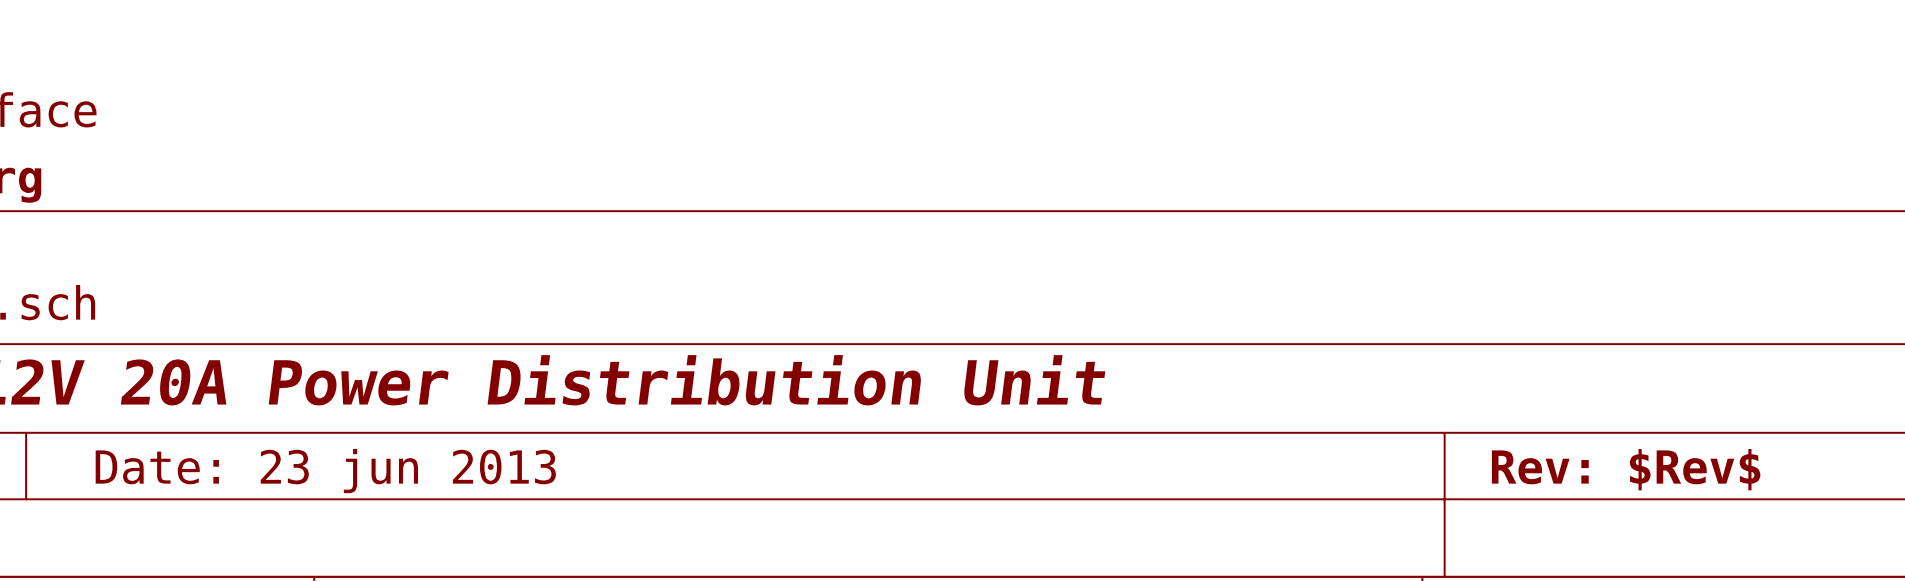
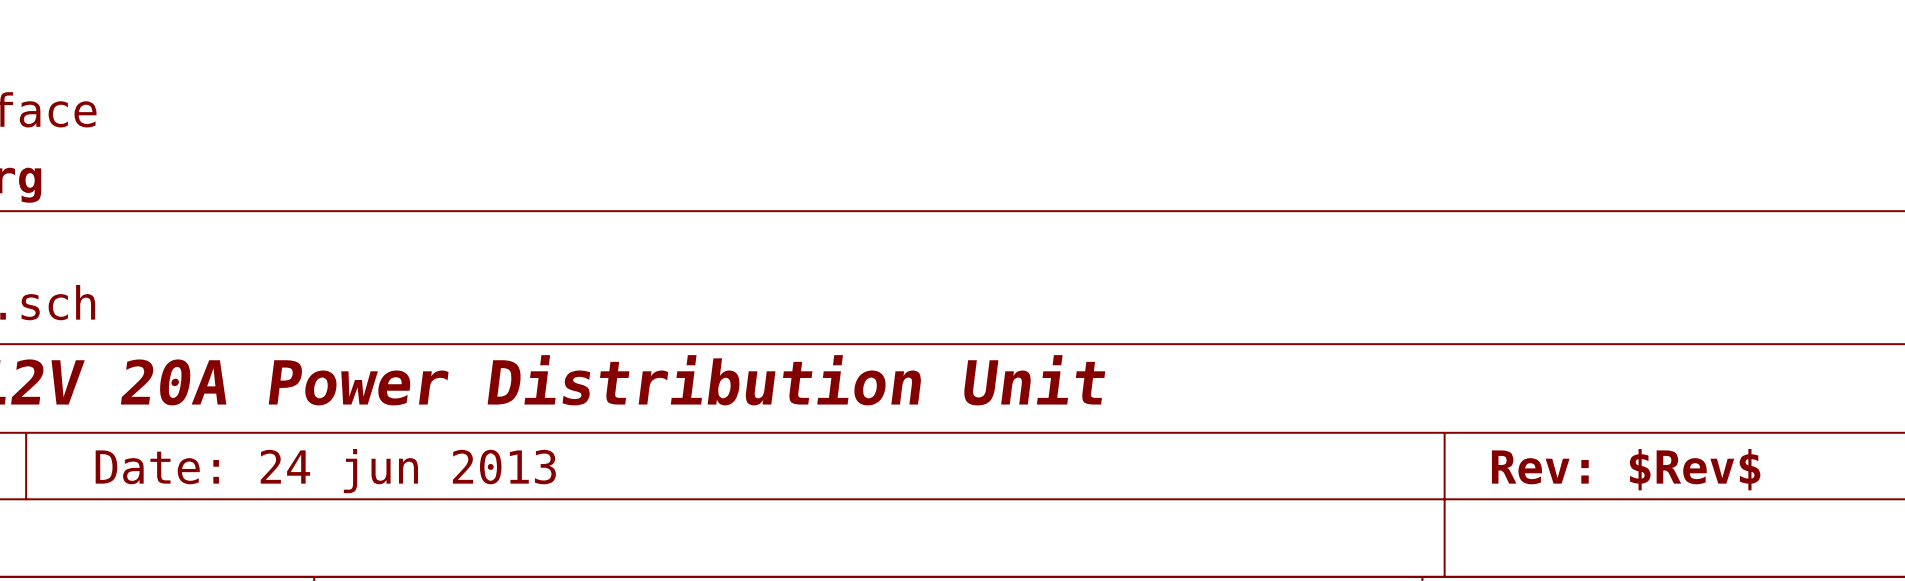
title block: Date: 23 jun 2013 (325, 471) -> Date: 24 jun 2013 (325, 471)

